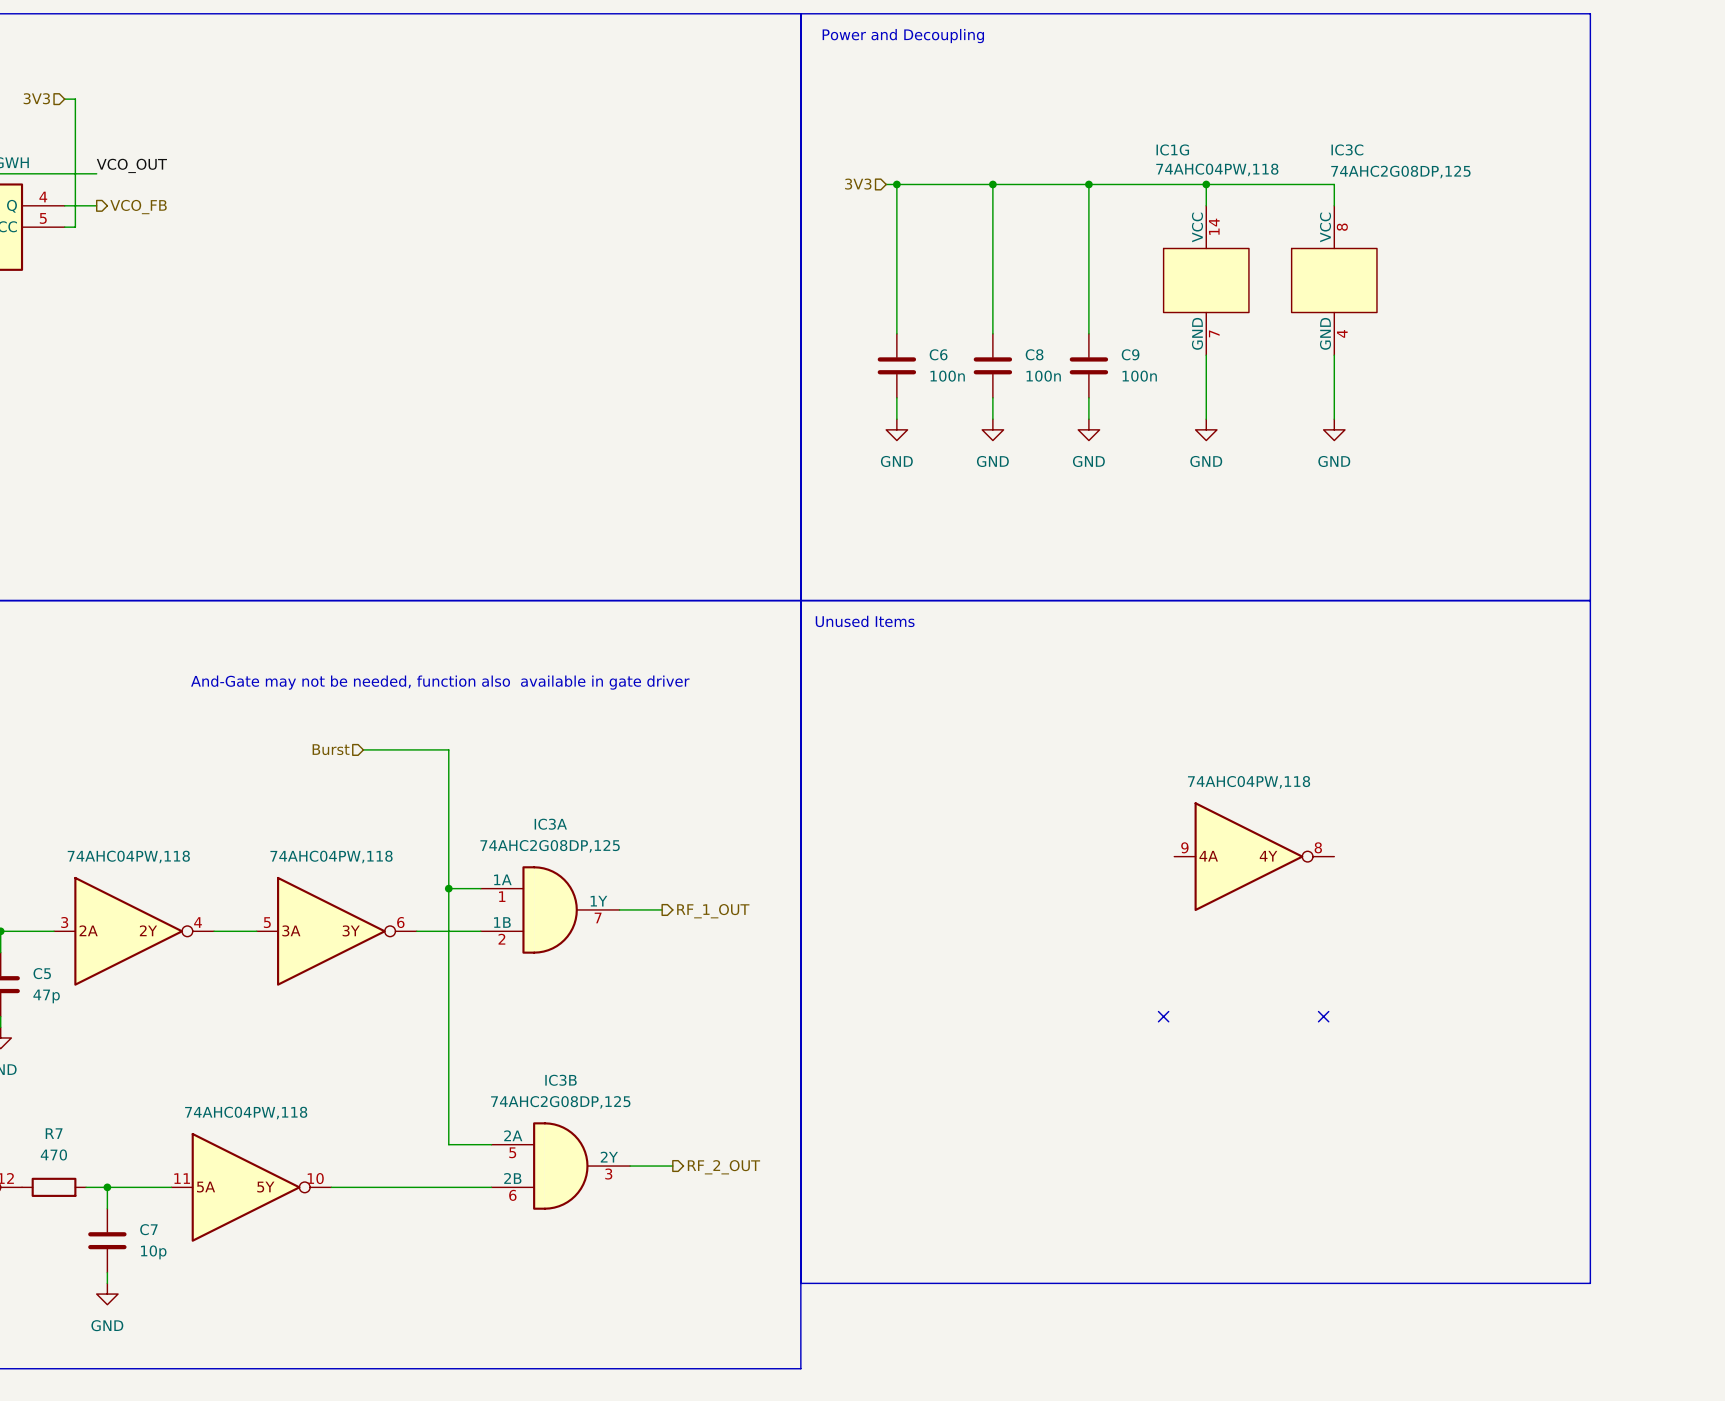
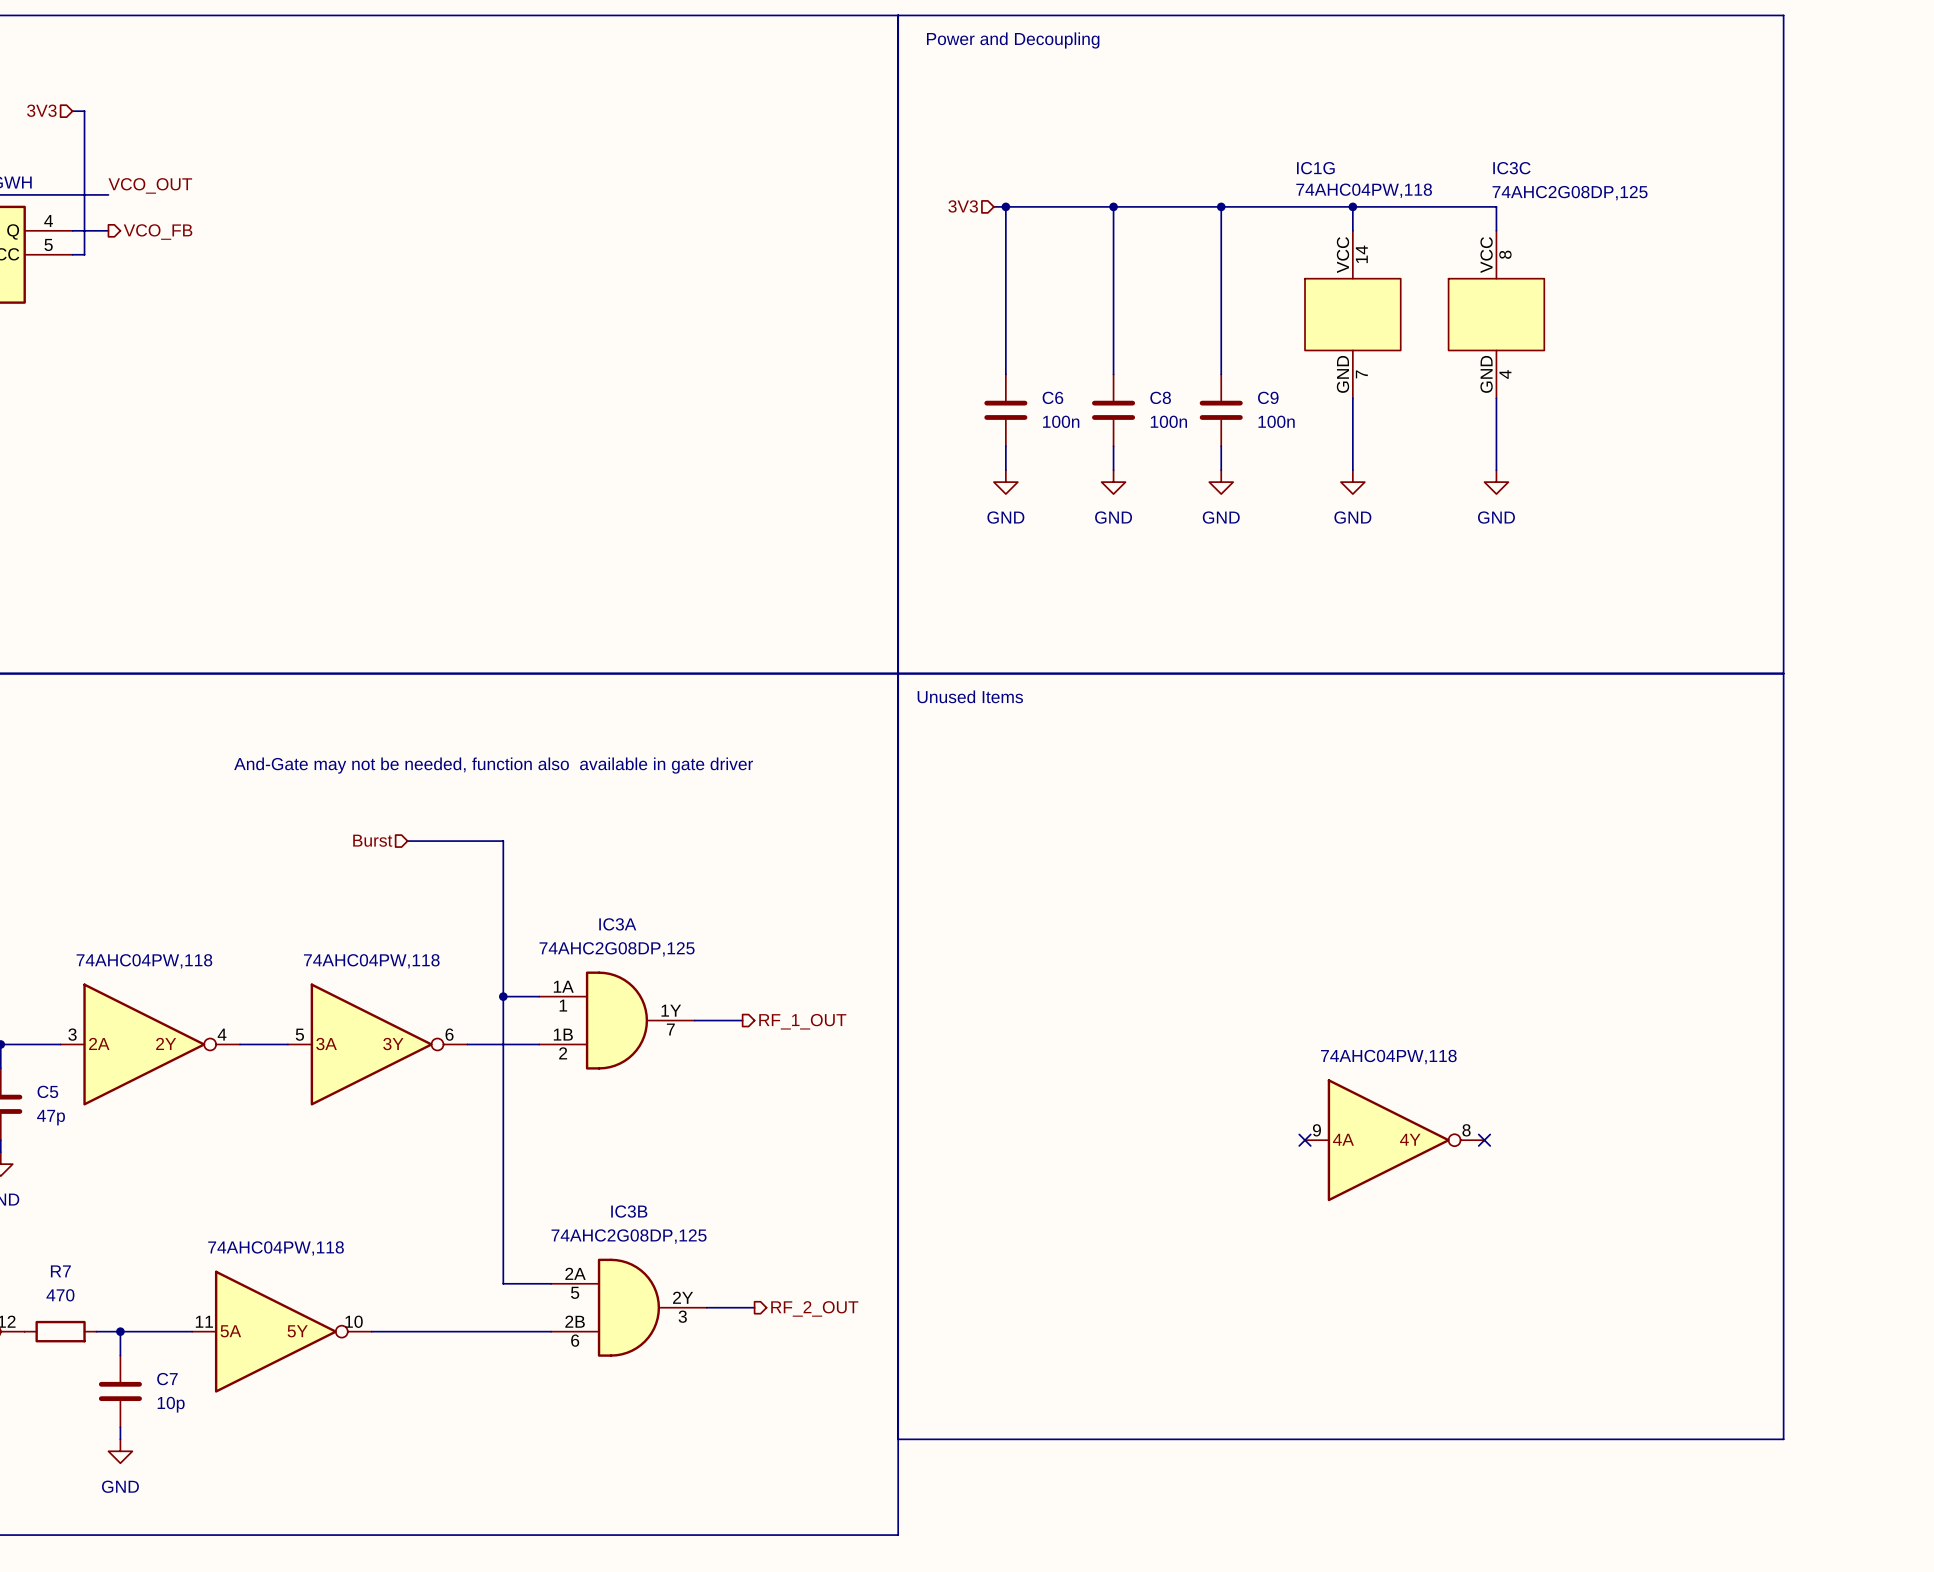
part position: (1254, 856) -> (1394, 1140)

